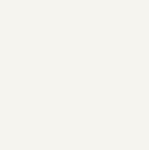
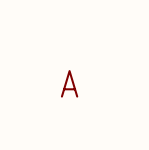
text: none -> A (69, 83)

